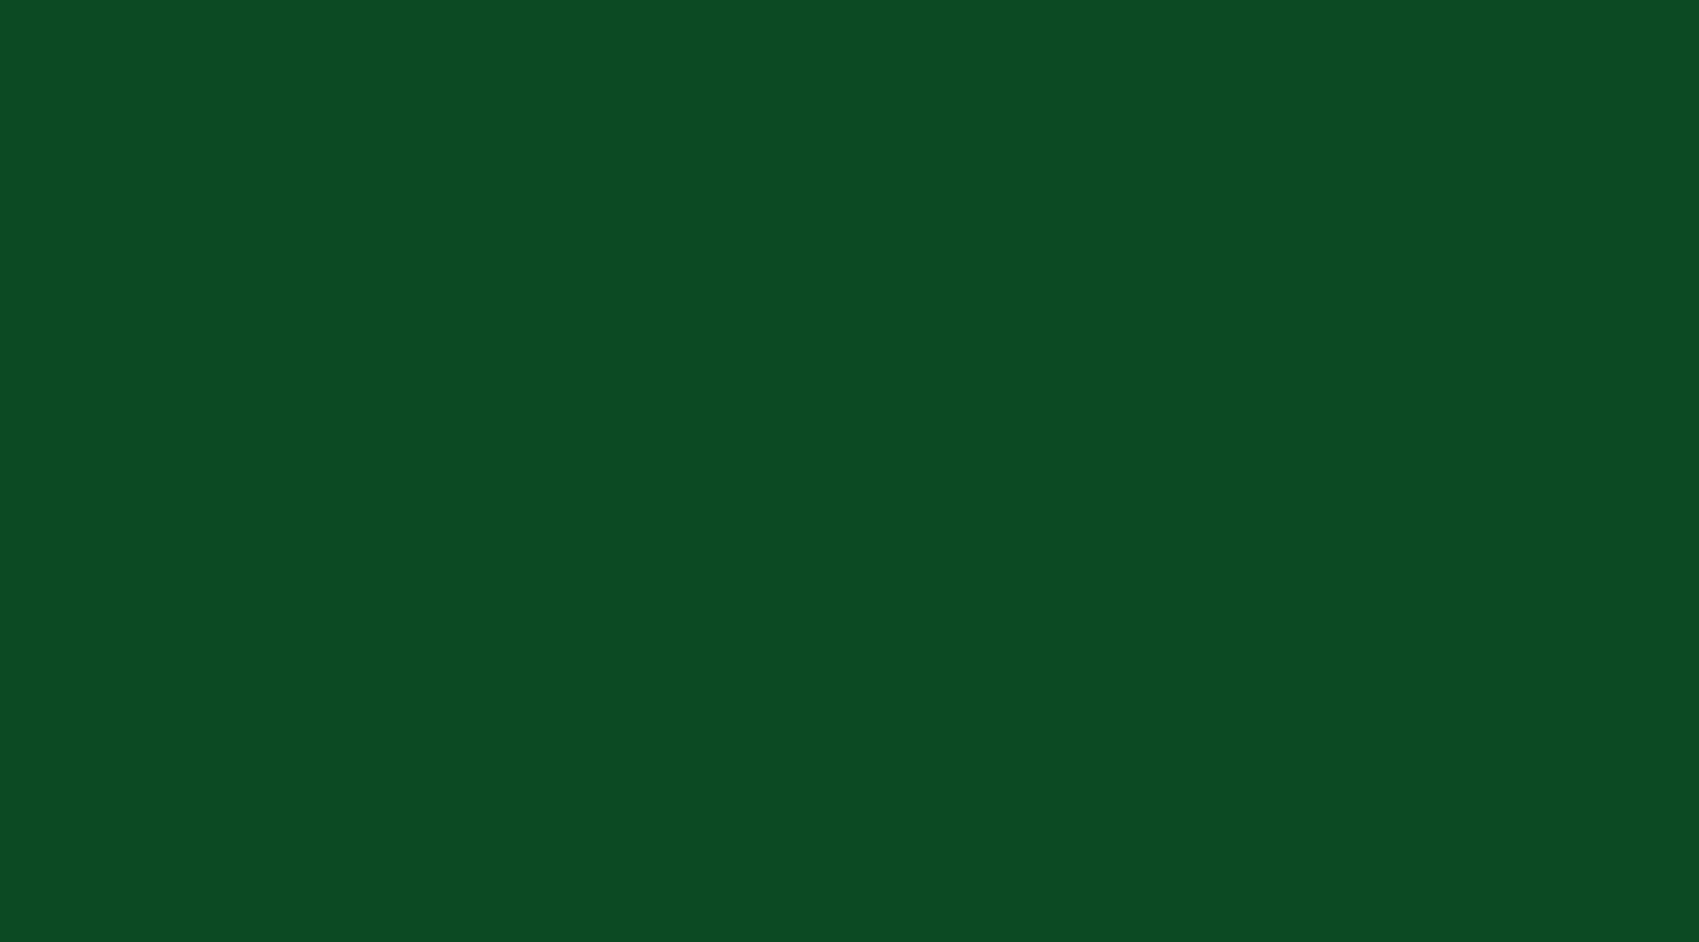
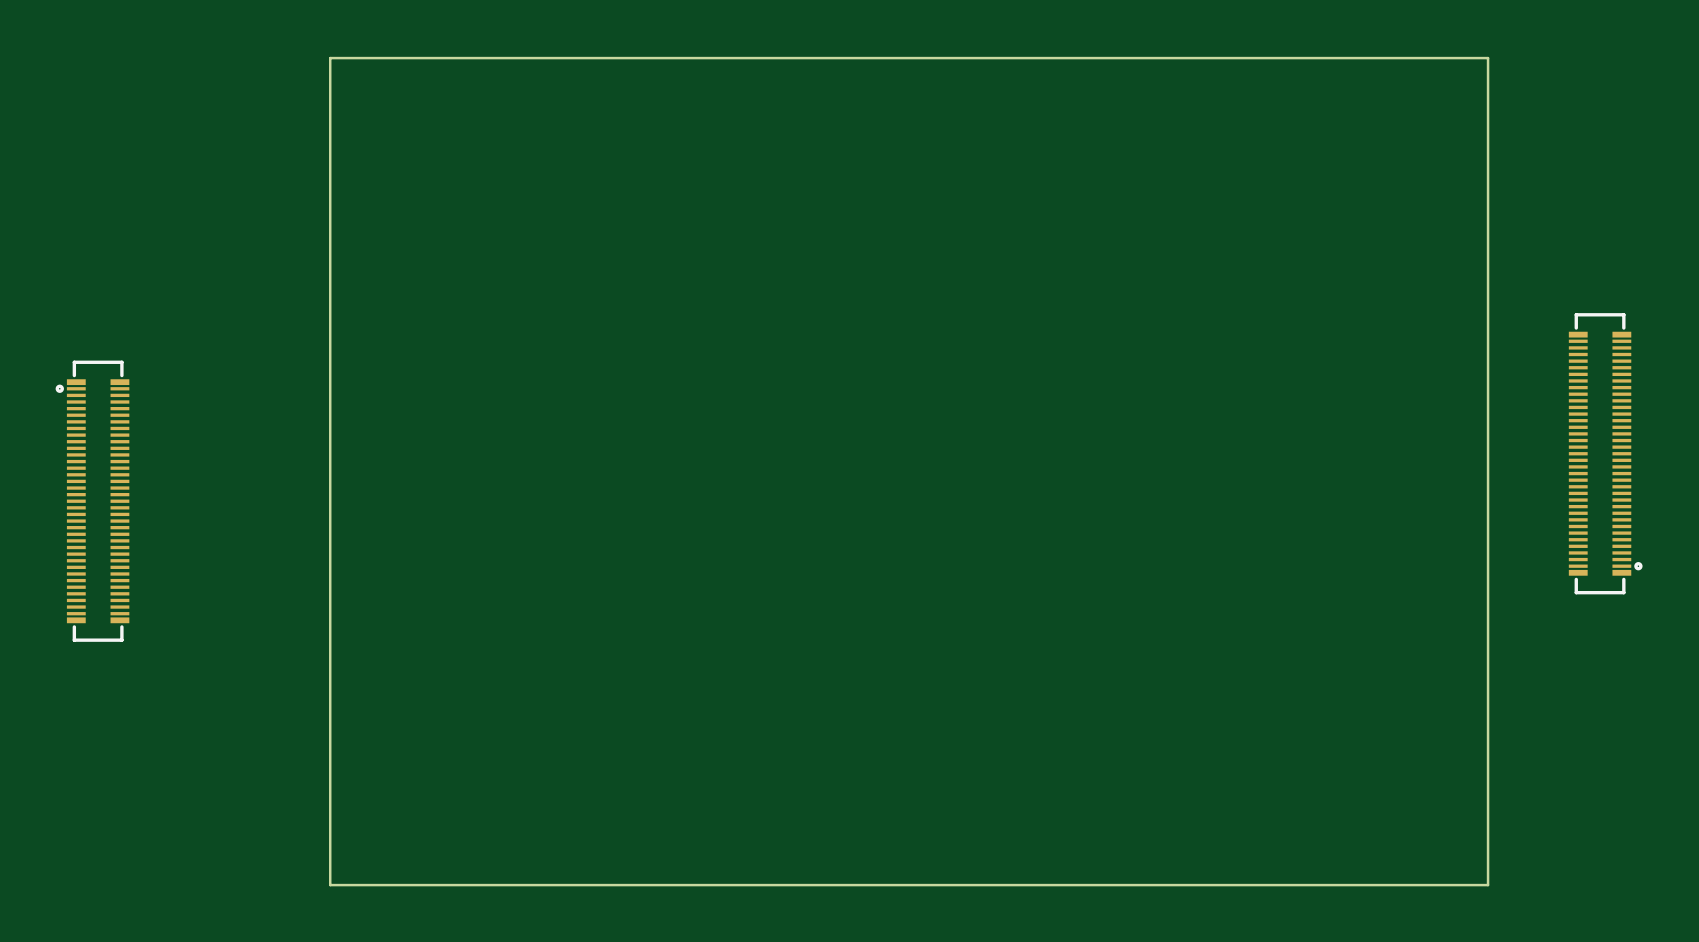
board edge: none -> (1488, 58) (1488, 885) (330, 885) (330, 58) (1488, 58)
part: none -> (1605, 453)
part: none -> (92, 501)

